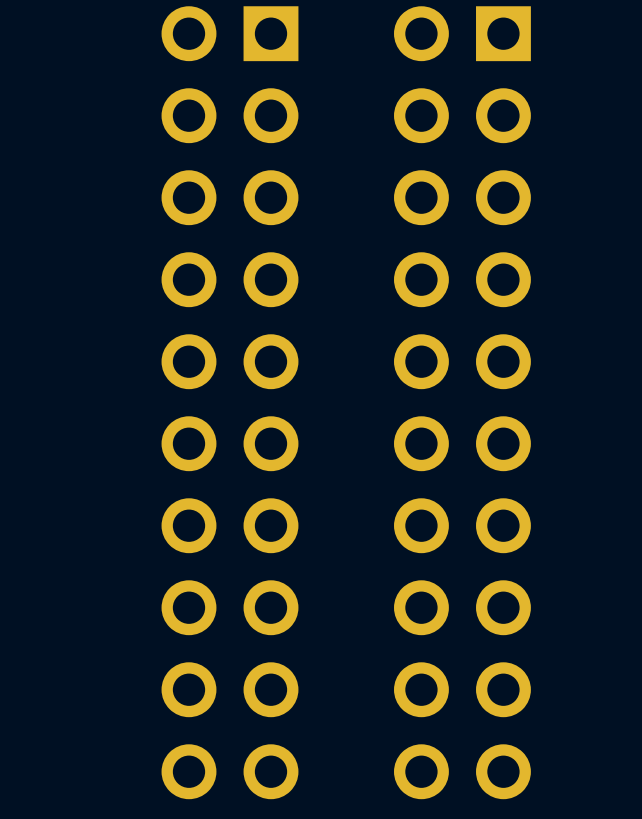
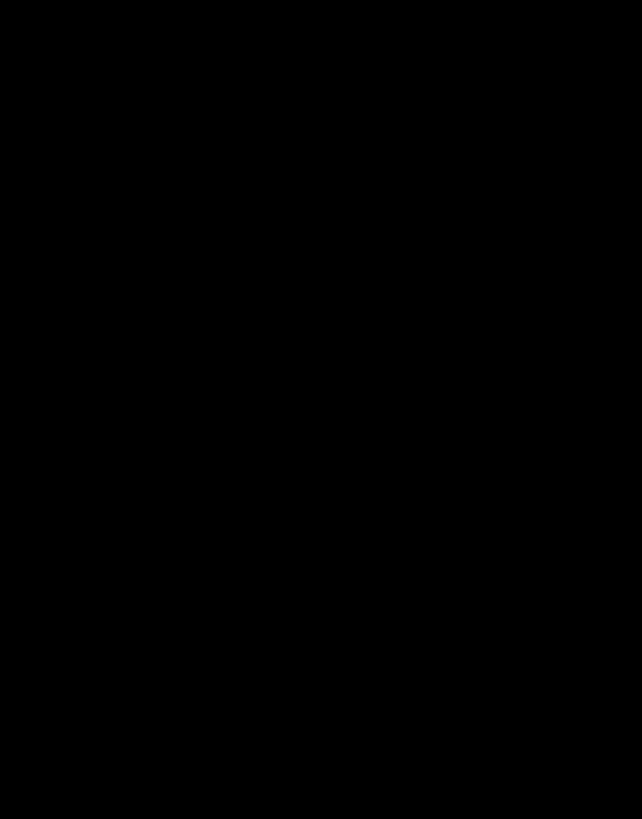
part: (229, 402) -> none
part: (462, 402) -> none

